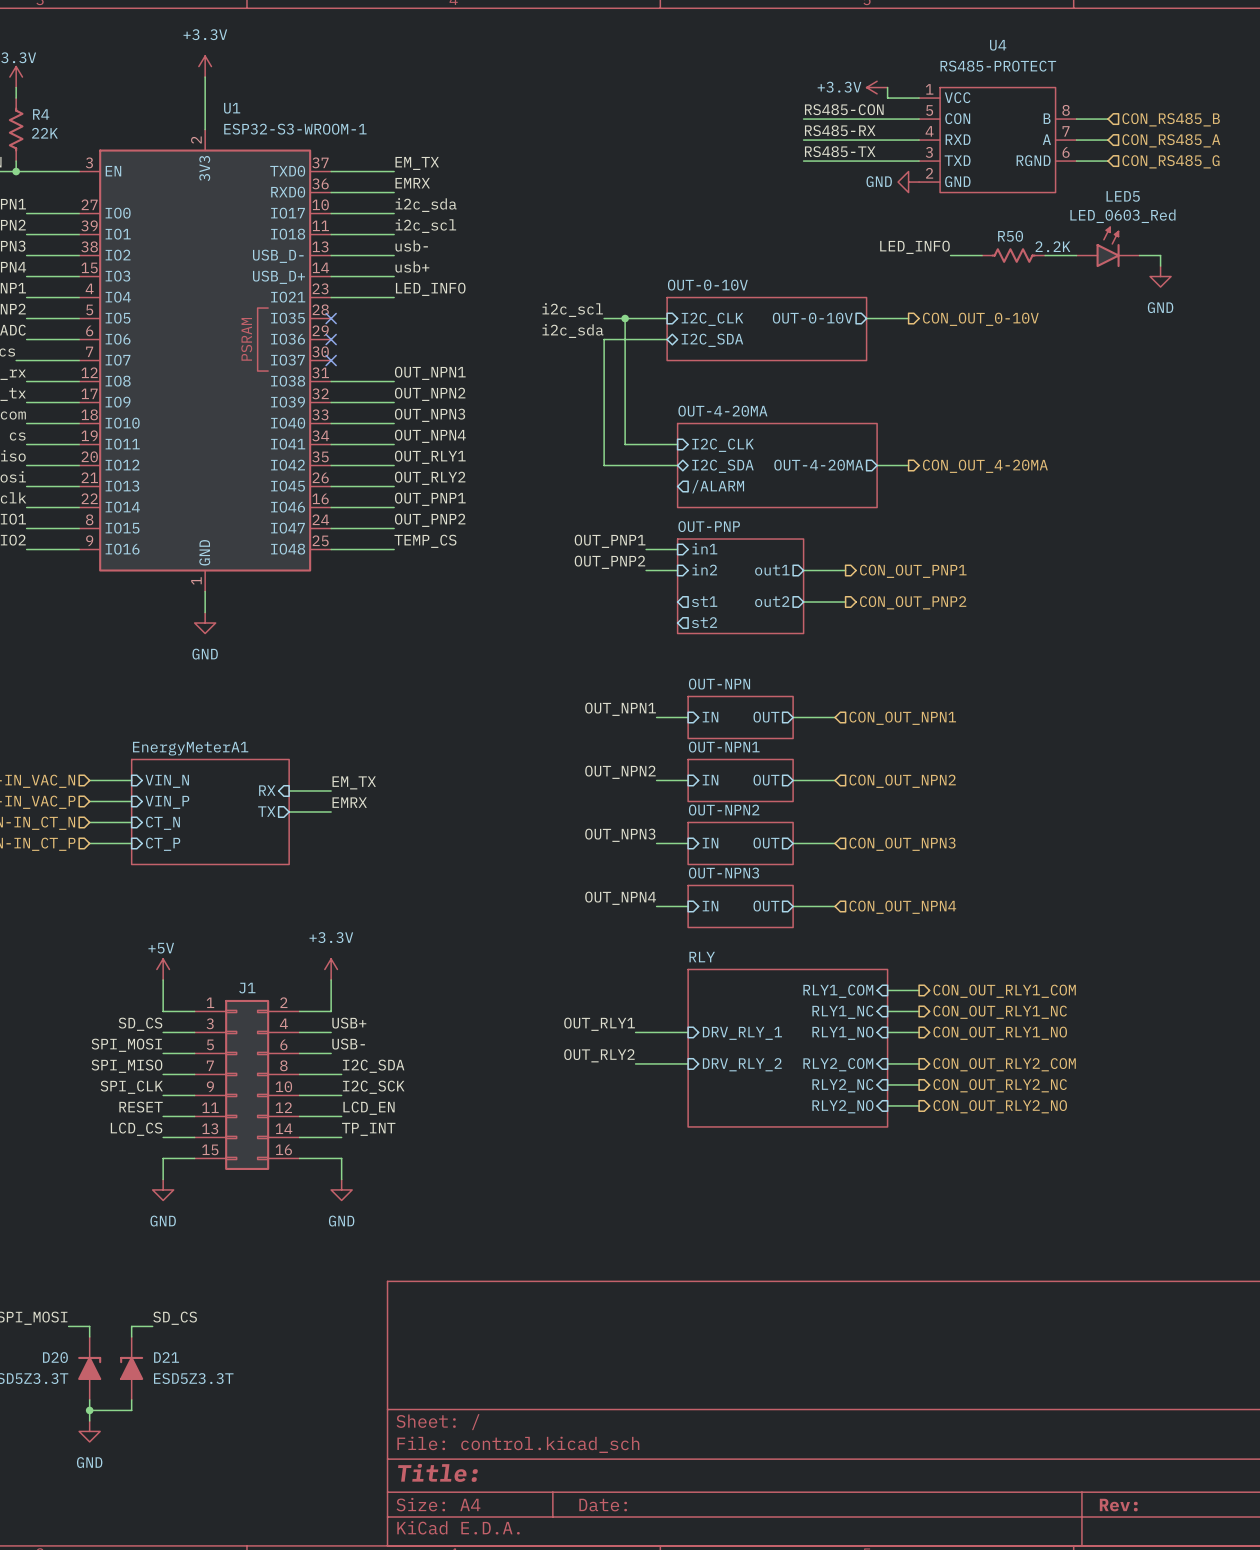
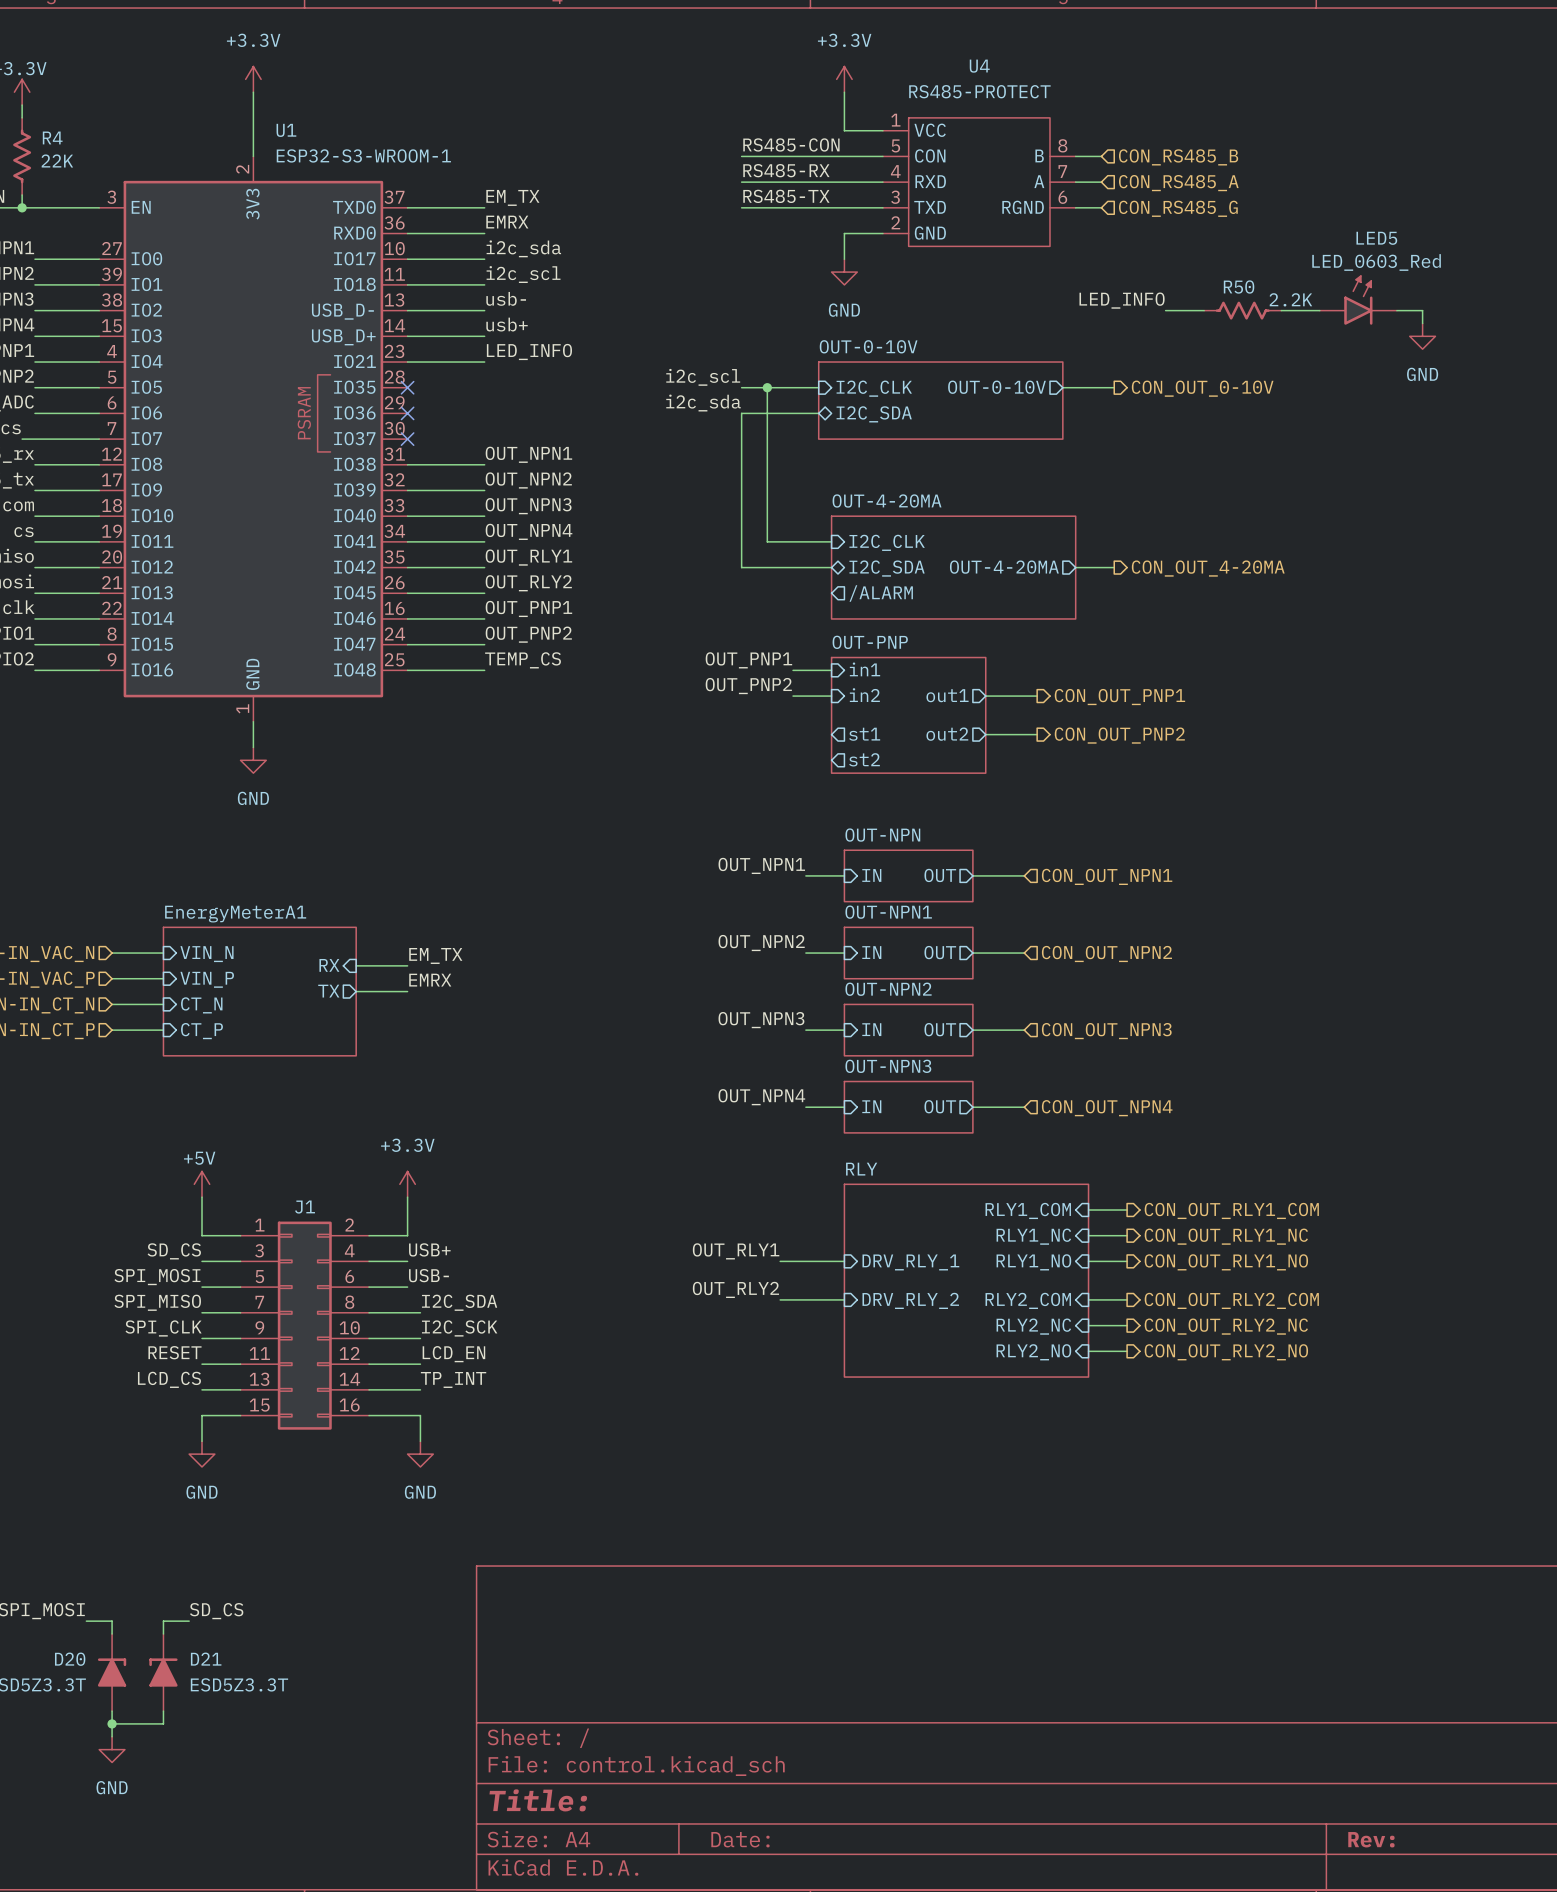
wire: none -> (844, 92) (844, 130) (882, 130)
power symbol rotation: 0° (877, 87) -> 90° clockwise (844, 79)
power symbol position: +3.3V (877, 87) -> +3.3V (844, 79)
wire: (887, 87) (887, 98) (919, 98) -> none
label position: RS485-CON (844, 109) -> RS485-CON (791, 144)
wire: (803, 119) (919, 119) -> (741, 156) (882, 156)
wire: (1076, 119) (1108, 119) -> none
hierarchical label: CON_RS485_B (1171, 119) -> none
wire: none -> (1075, 156) (1101, 156)
label position: RS485-RX (840, 130) -> RS485-RX (786, 170)
hierarchical label: none -> CON_RS485_B (1178, 157)
wire: (803, 140) (919, 140) -> (741, 182) (882, 182)
U4 position: (997, 140) -> (979, 182)
wire: (1076, 140) (1108, 140) -> none
hierarchical label: CON_RS485_A (1171, 140) -> none
wire: none -> (1075, 182) (1101, 182)
label position: RS485-TX (840, 151) -> RS485-TX (786, 196)
hierarchical label: none -> CON_RS485_A (1178, 183)
wire: (803, 161) (919, 161) -> (741, 207) (882, 207)
wire: (1076, 161) (1108, 161) -> none
hierarchical label: CON_RS485_G (1170, 161) -> none
wire: none -> (1075, 207) (1101, 207)
hierarchical label: none -> CON_RS485_G (1178, 208)
power symbol: GND (908, 182) -> none
wire: none -> (882, 233) (844, 233) (844, 259)
power symbol: none -> GND (844, 272)

